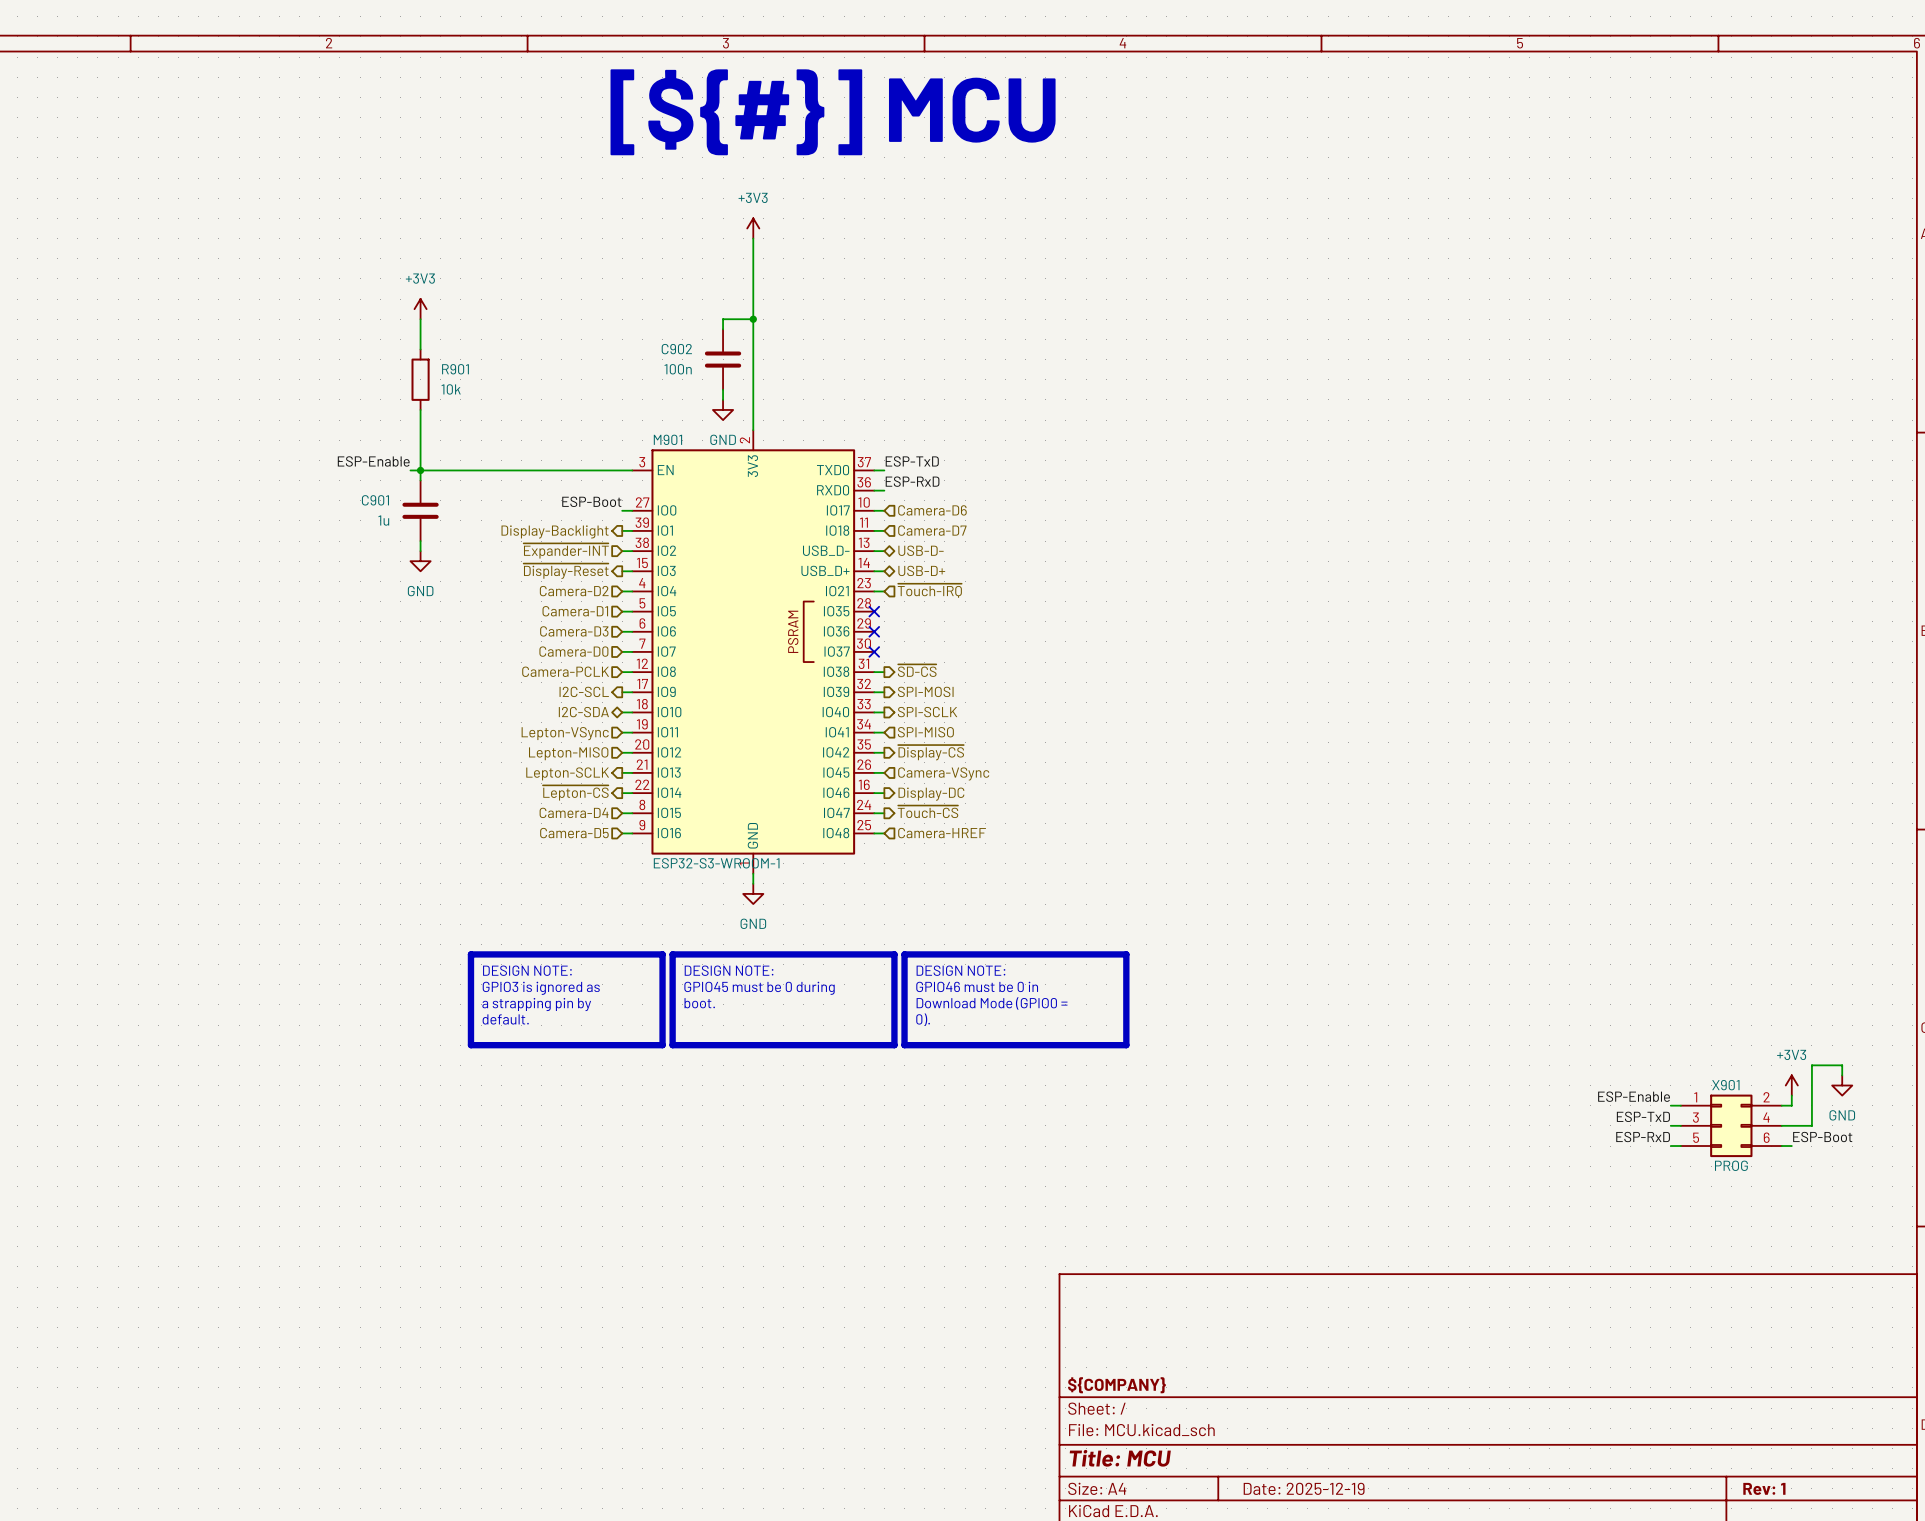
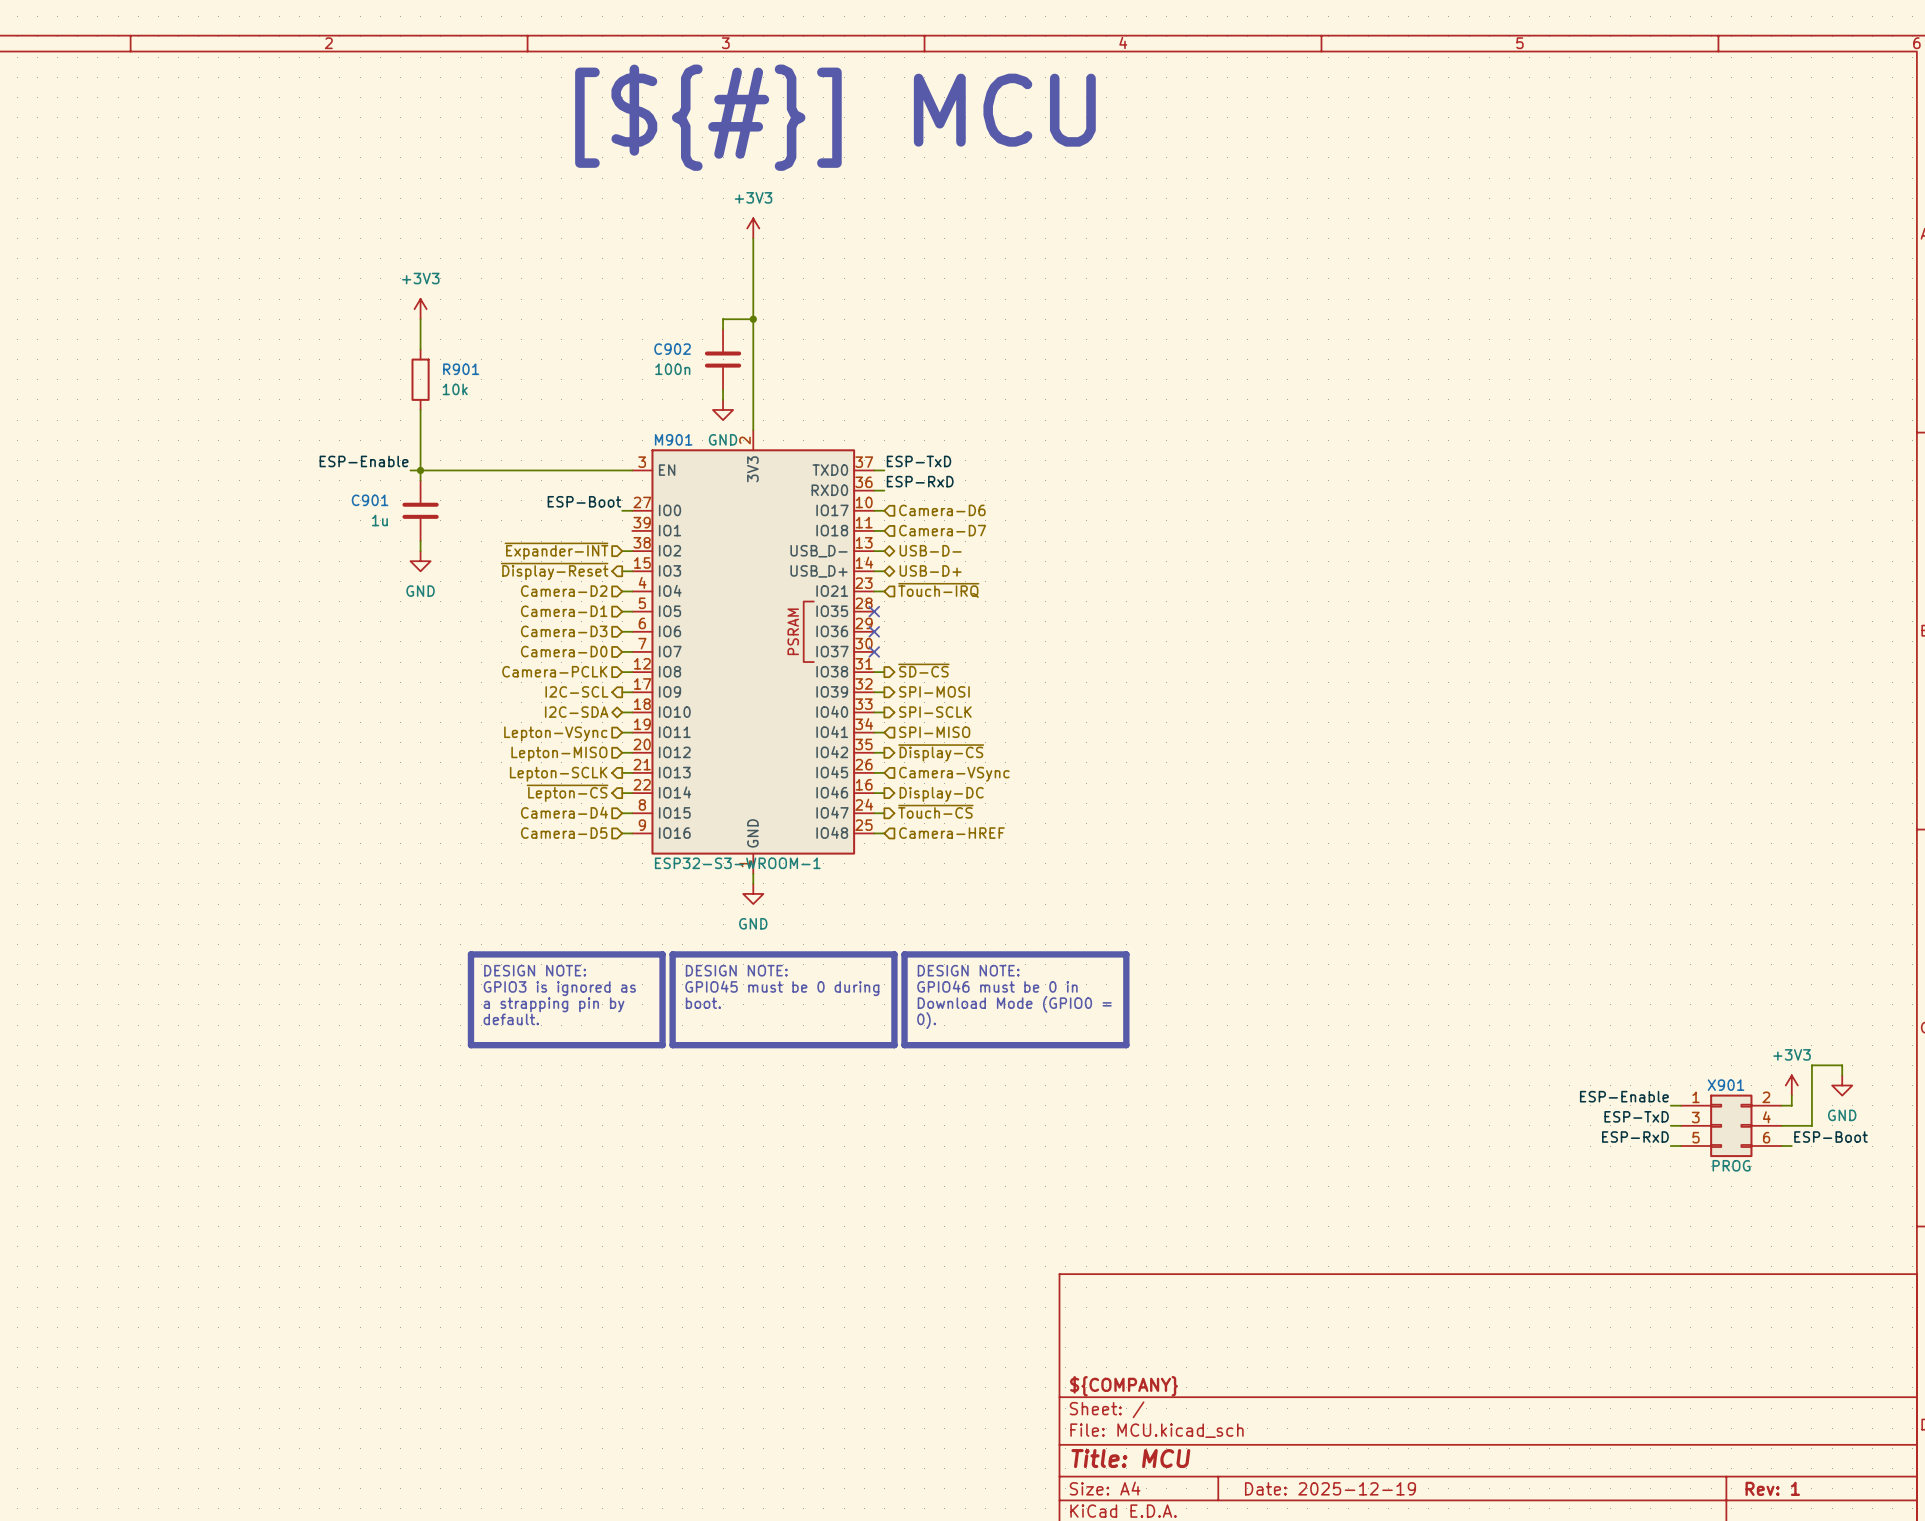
wire: (622, 530) (632, 530) -> none
hierarchical label: Display-Backlight (555, 531) -> none

